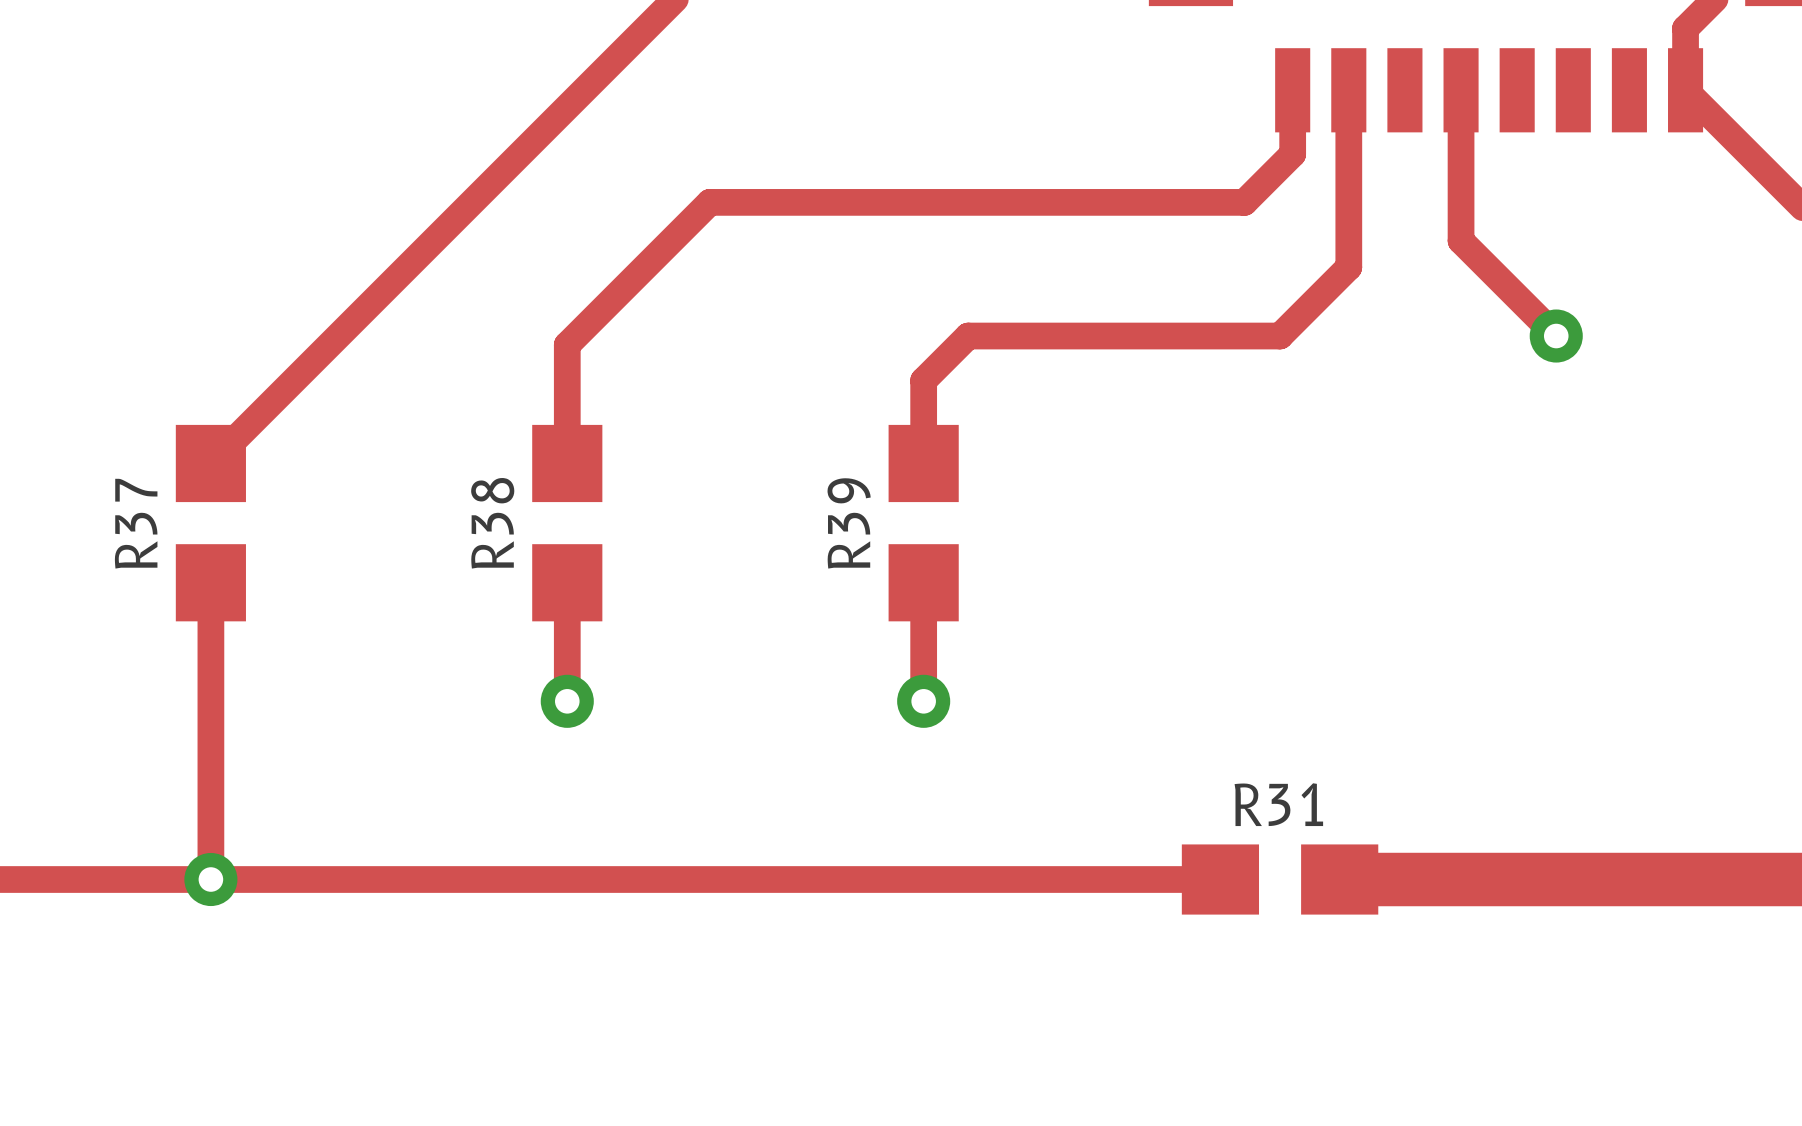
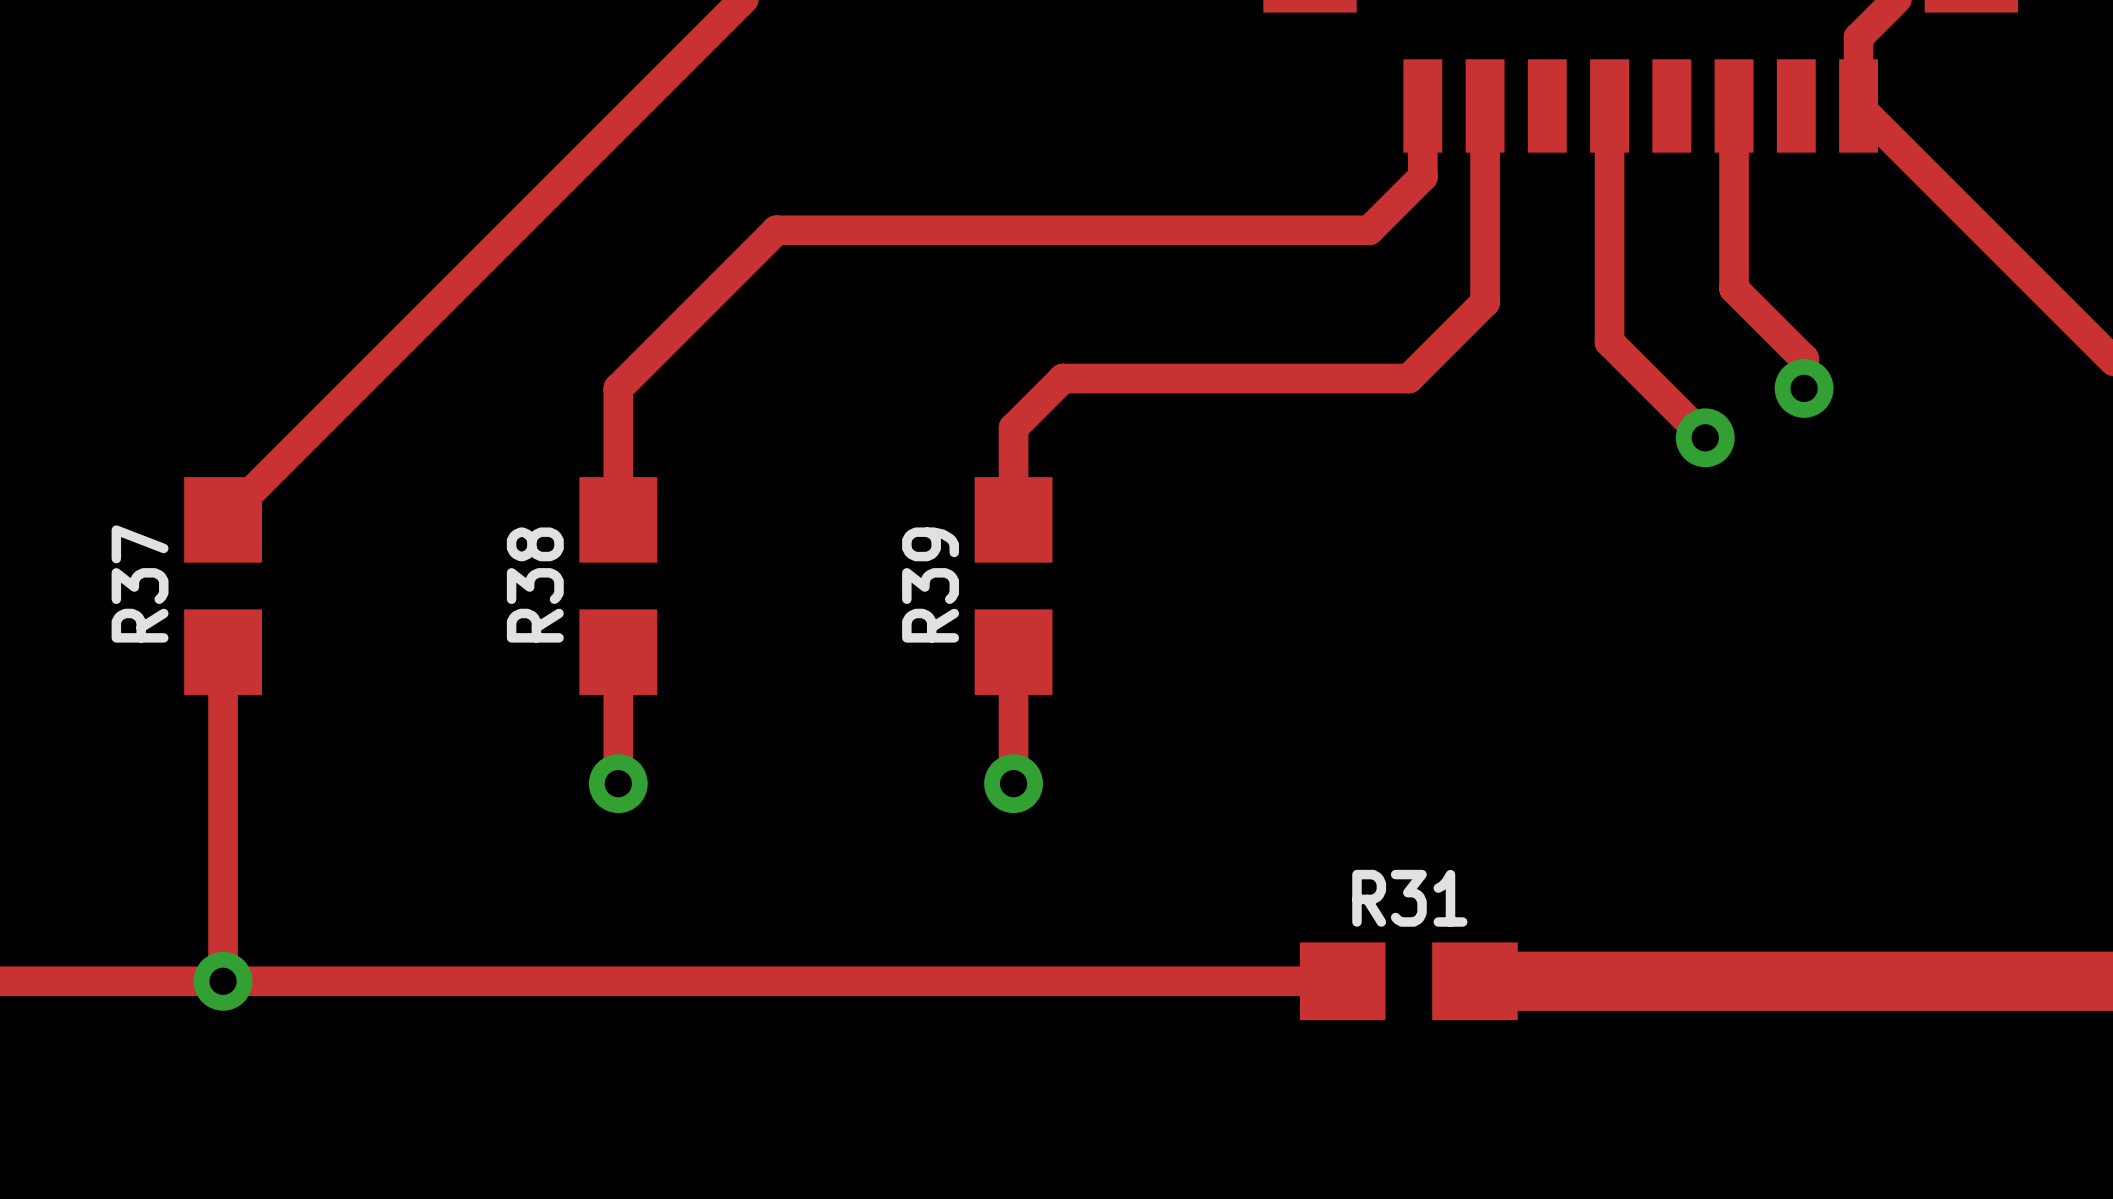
track: none -> (1734, 105) (1734, 288) (1804, 358) (1804, 388)
track: (1461, 240) (1556, 336) -> (1609, 272) (1609, 342) (1705, 437)
via: (1556, 336) -> none
via: none -> (1804, 388)
via: none -> (1705, 437)

